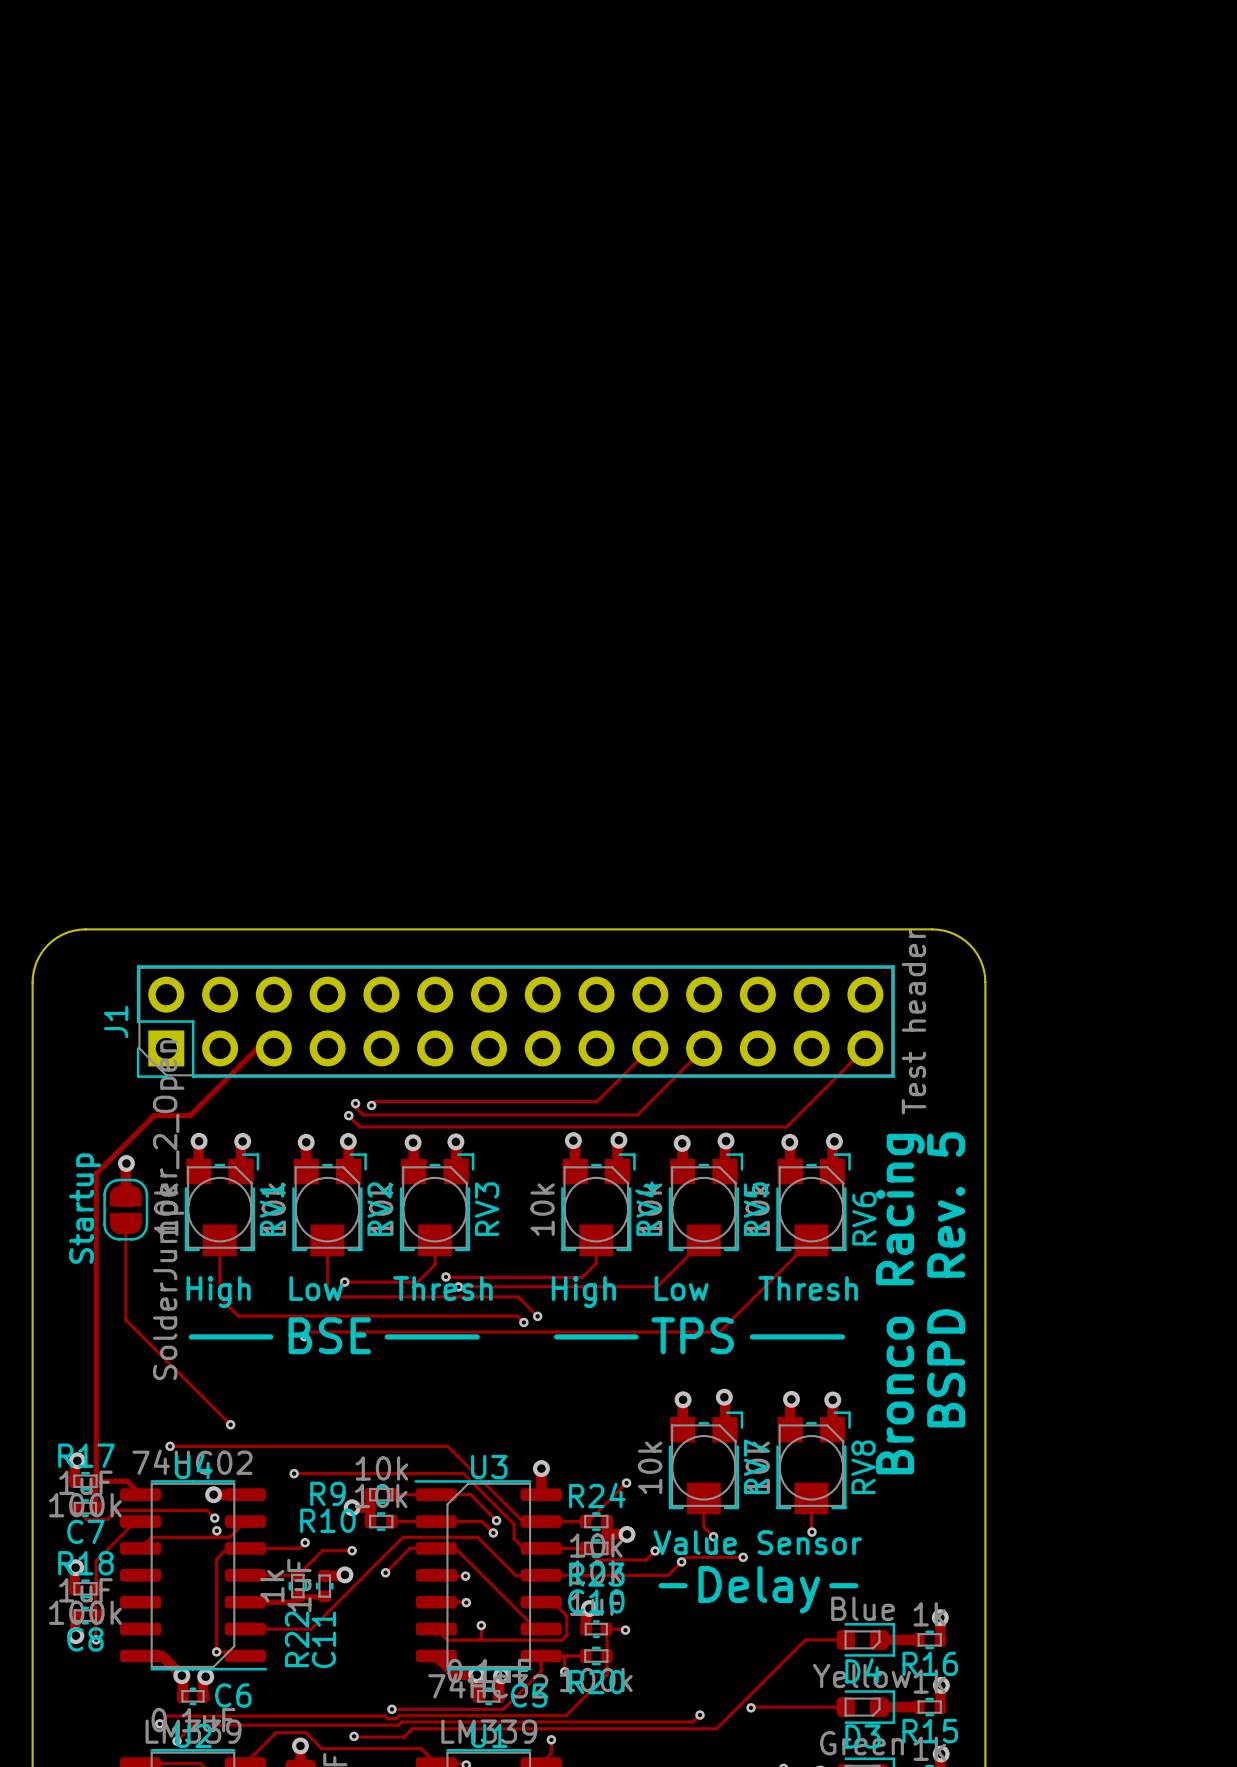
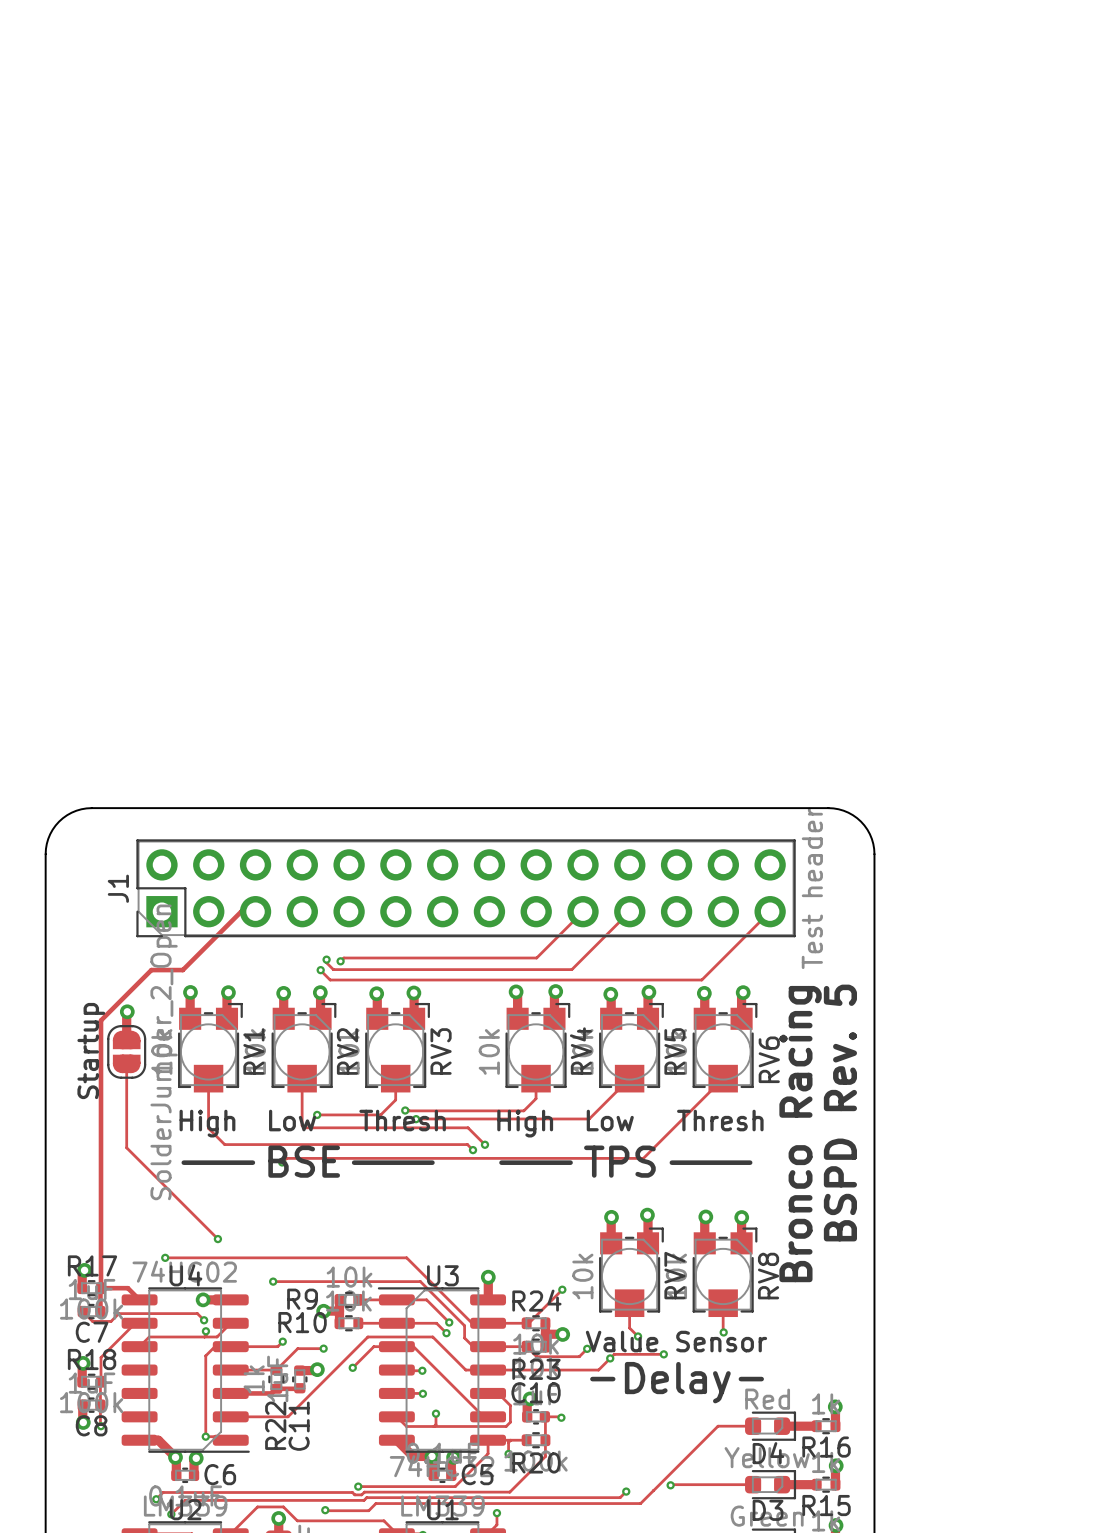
D4 value: Blue (863, 1608) -> Red (767, 1399)

